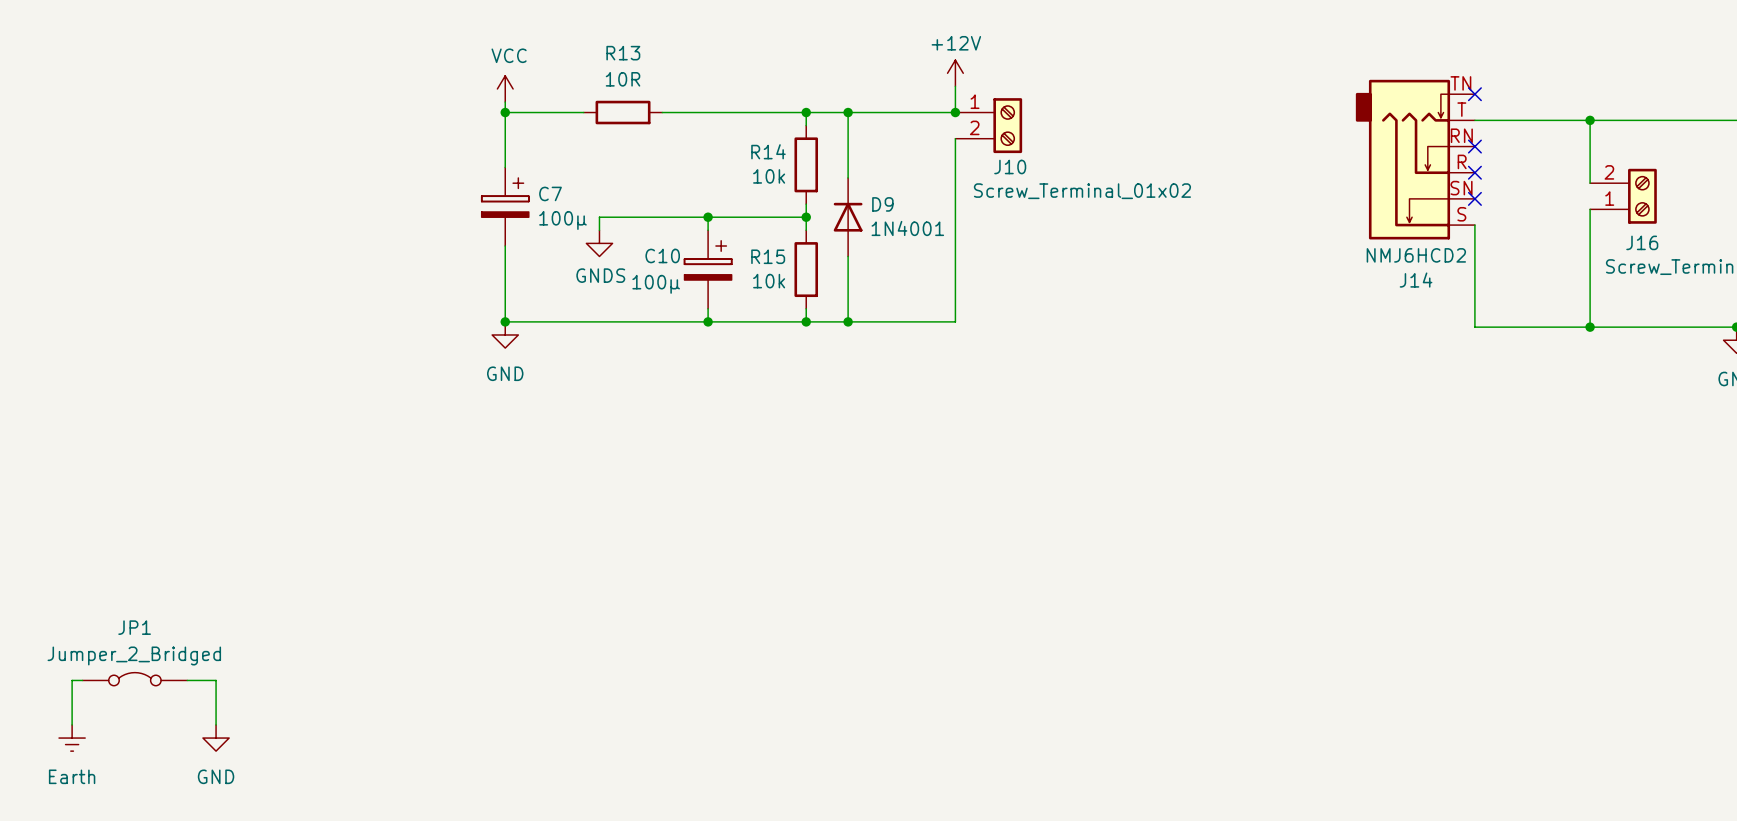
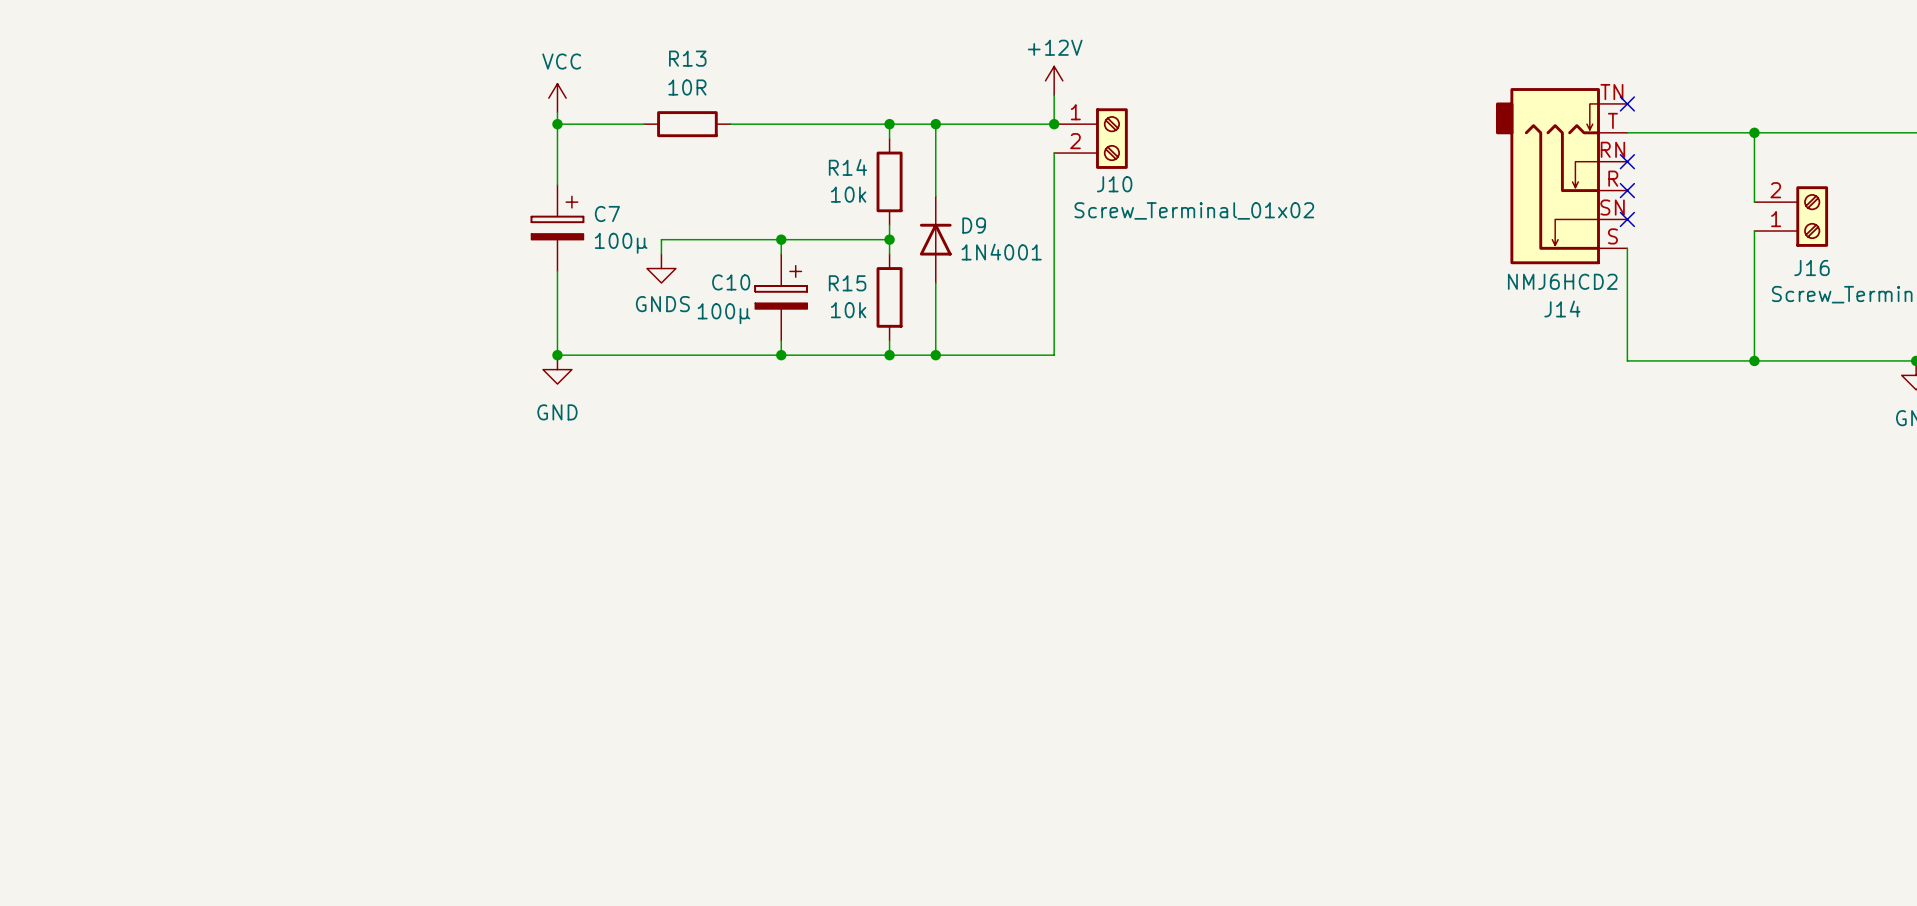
JP1: Jumper_2_Bridged (134, 679) -> none
wire: (82, 680) (72, 680) (72, 724) -> none
wire: (187, 680) (216, 680) (216, 724) -> none
power symbol: Earth (72, 738) -> none
power symbol: GND (216, 738) -> none

